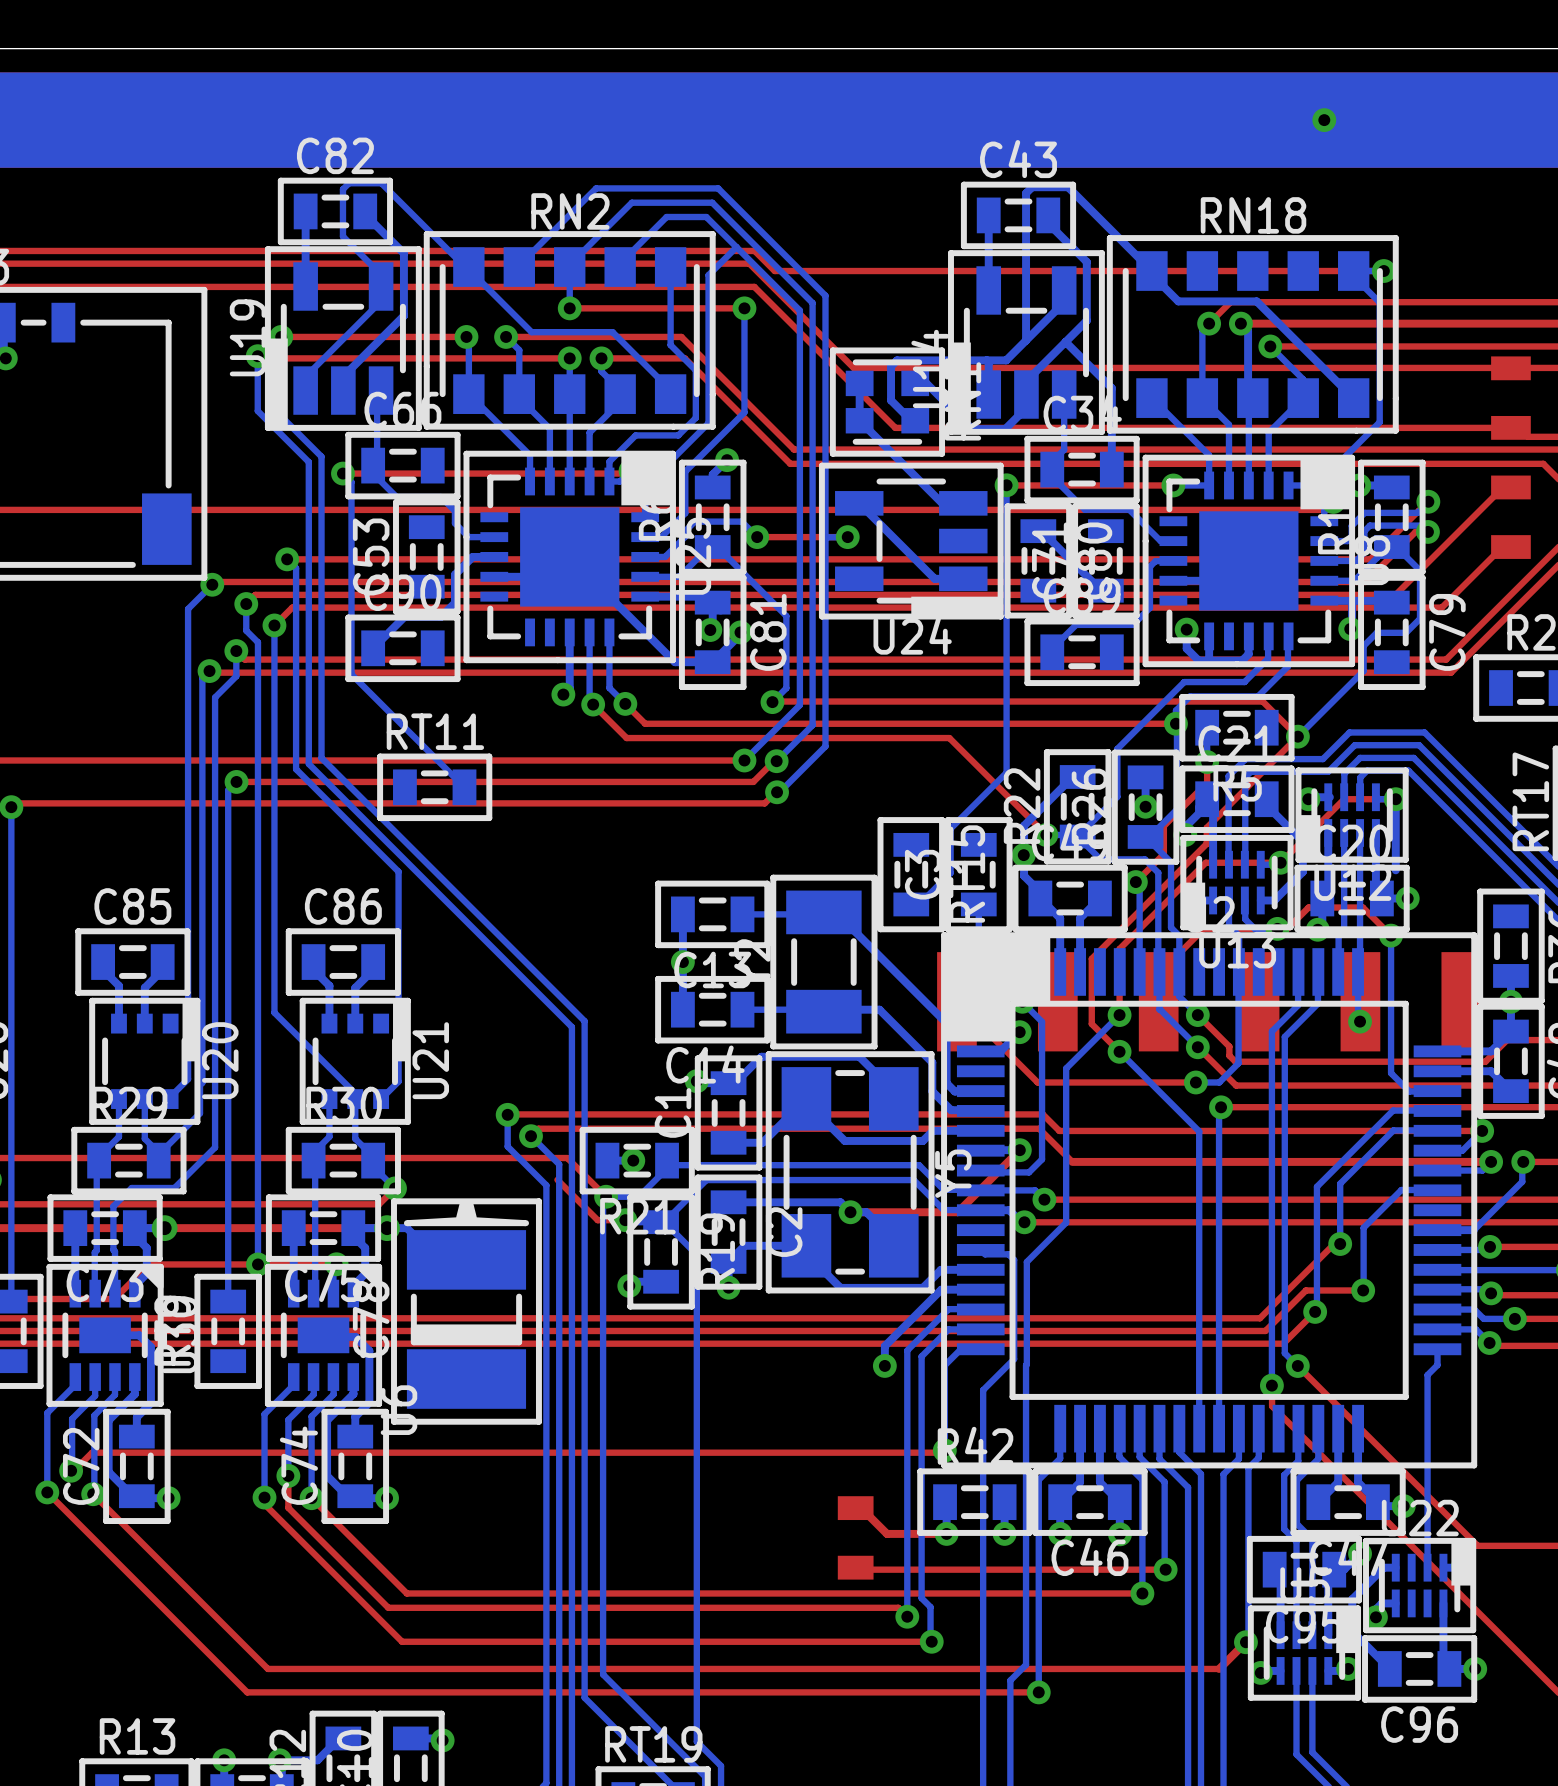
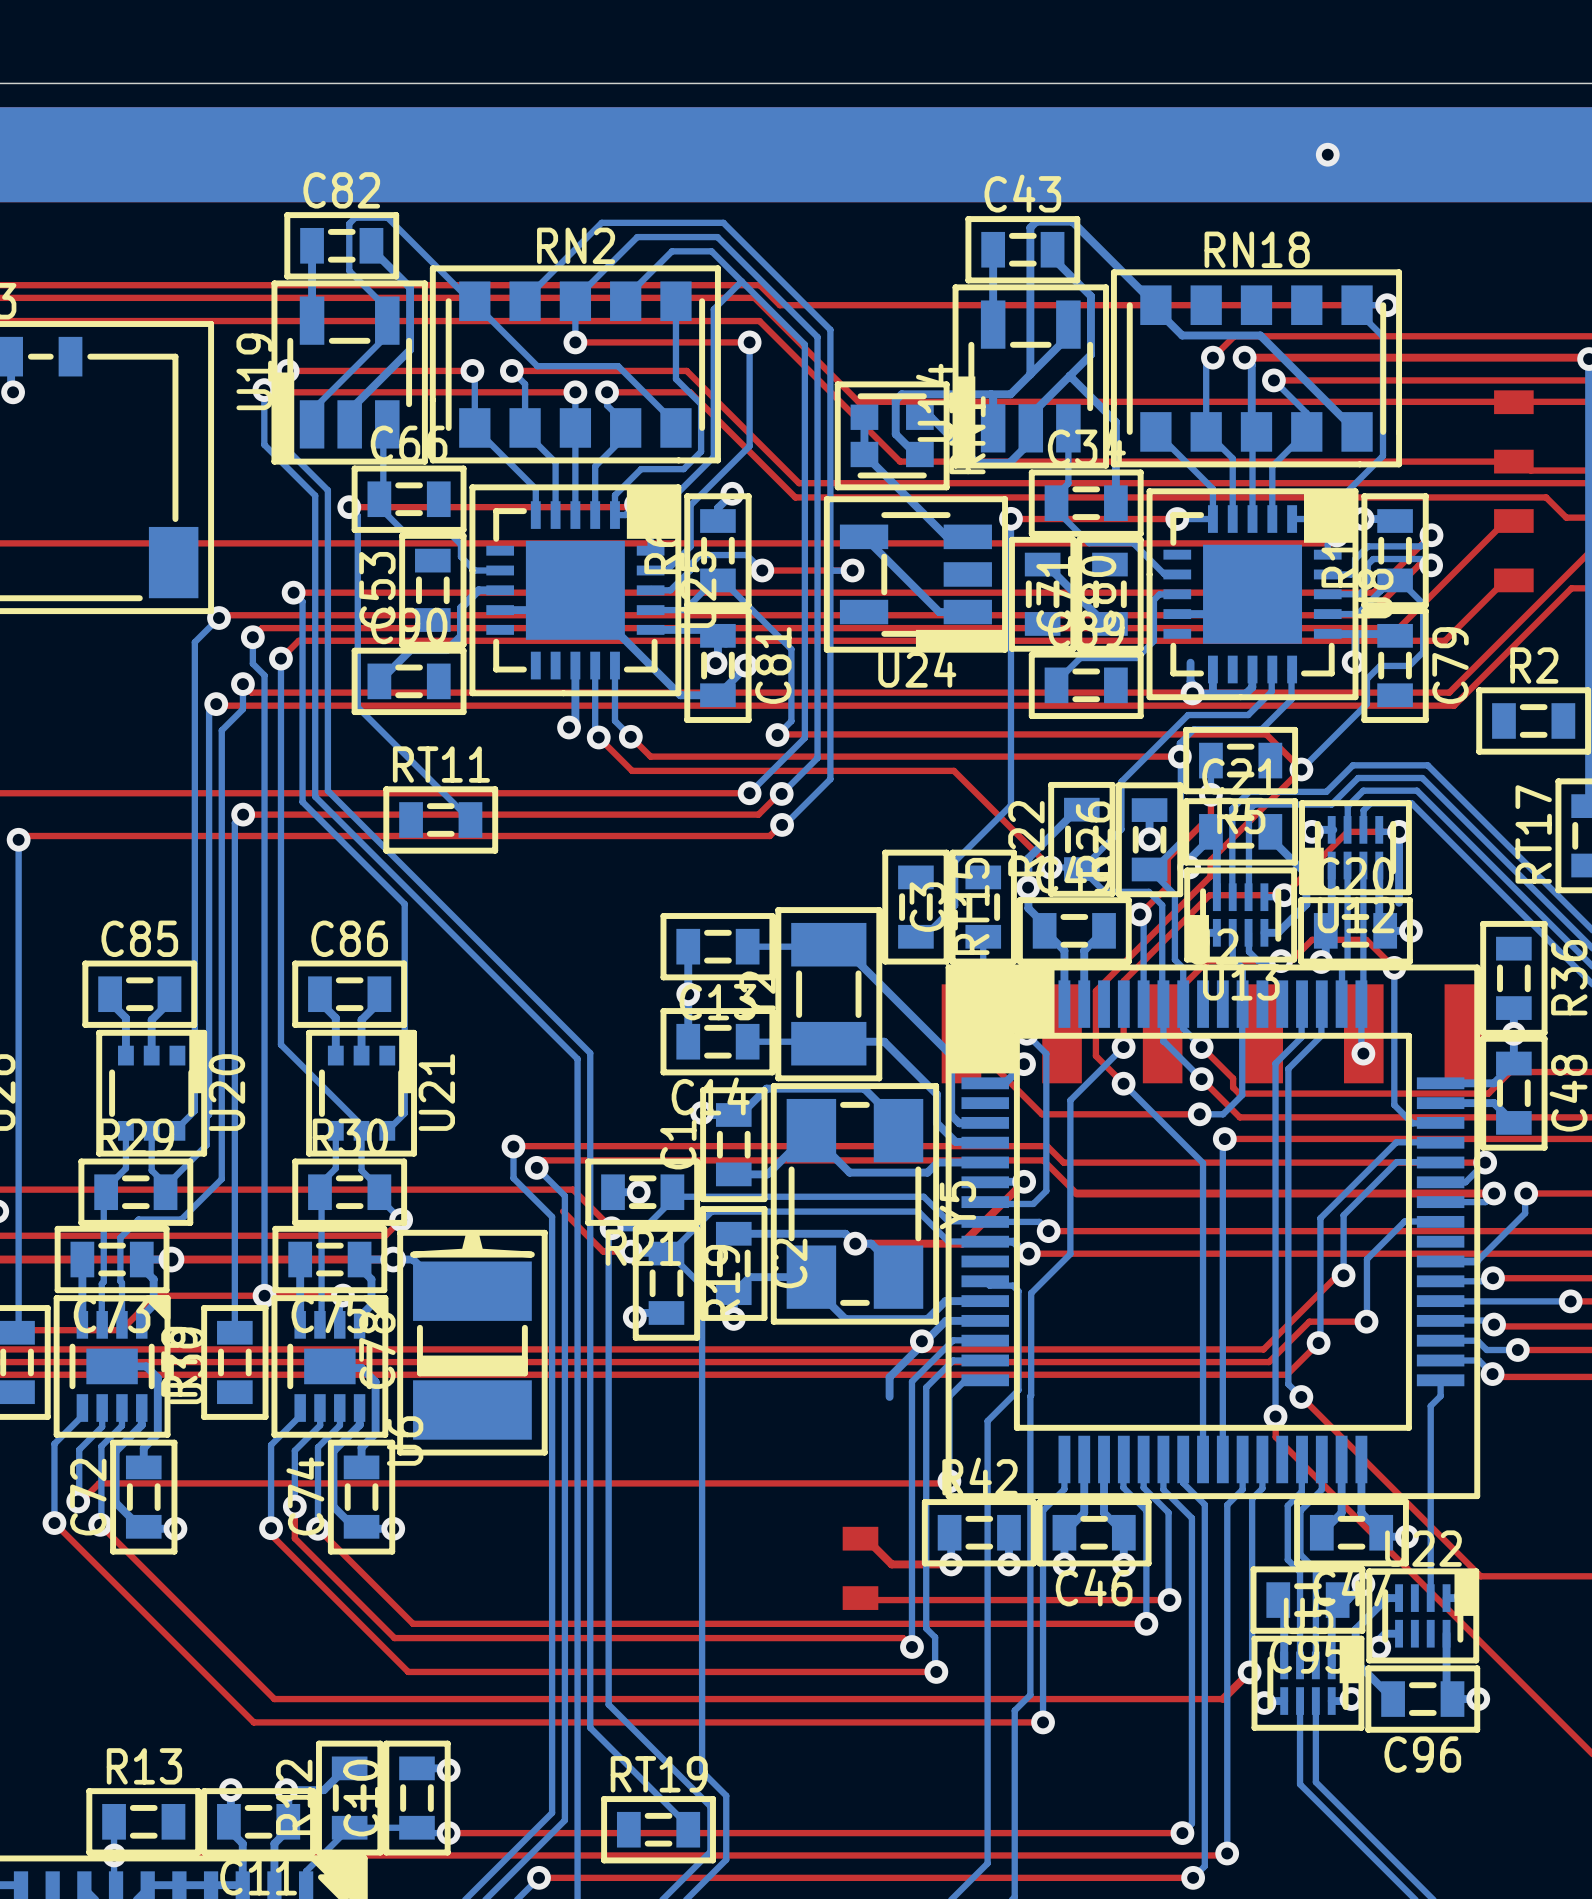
via position: (1186, 629) -> (1192, 693)
via position: (884, 1365) -> (921, 1341)

